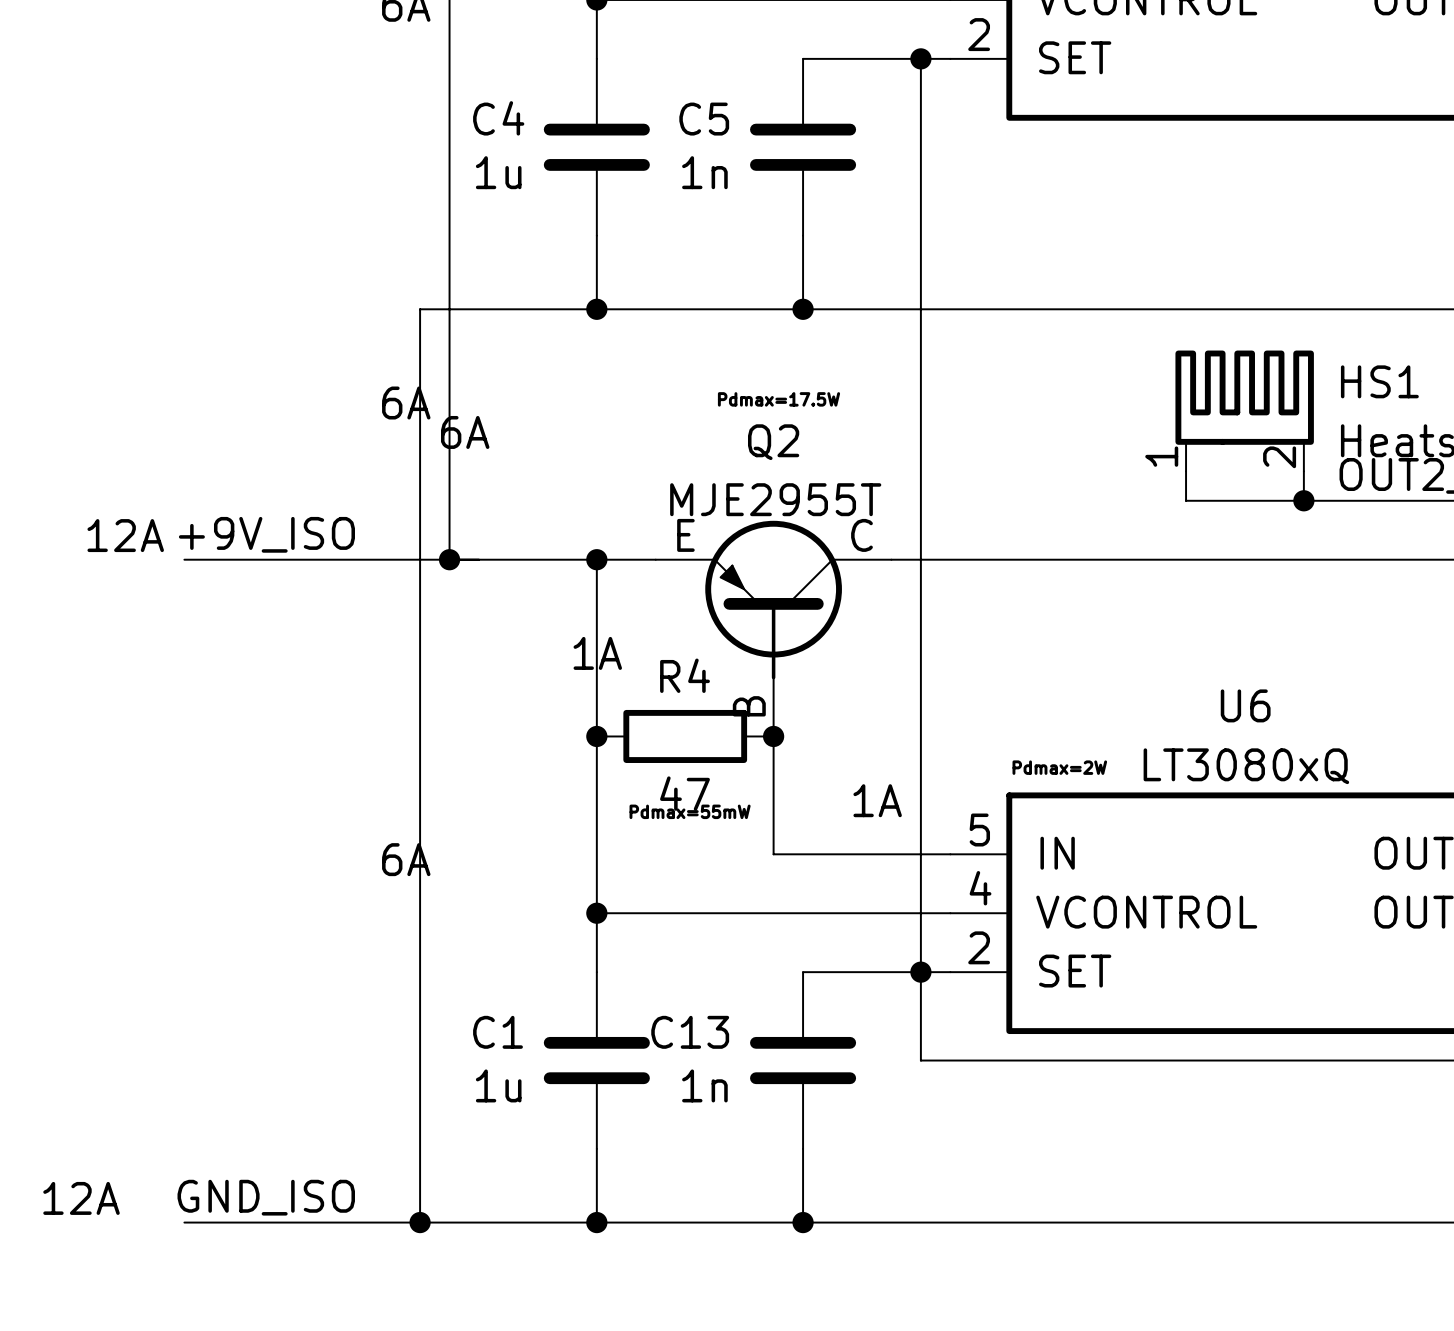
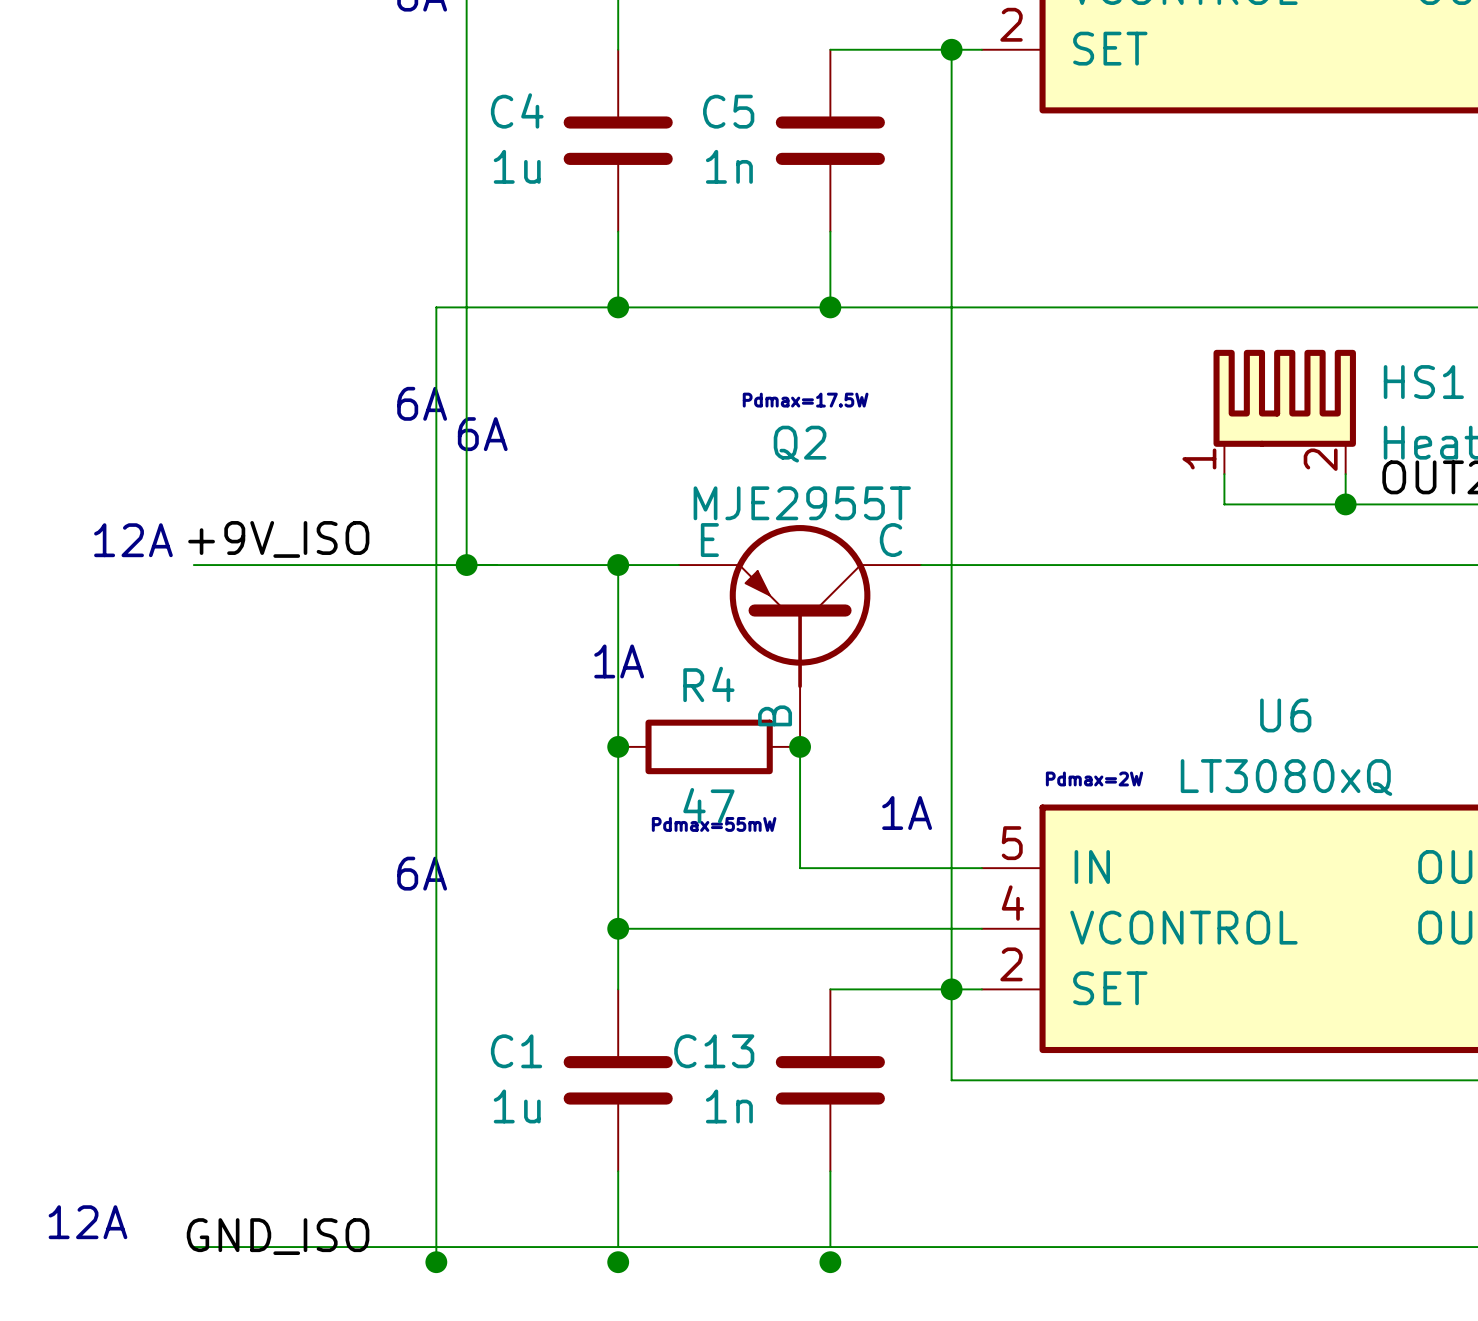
label position: GND_ISO (266, 1197) -> GND_ISO (278, 1236)
junction position: (420, 1222) -> (436, 1262)
junction position: (596, 1222) -> (618, 1262)
junction position: (803, 1222) -> (830, 1262)

